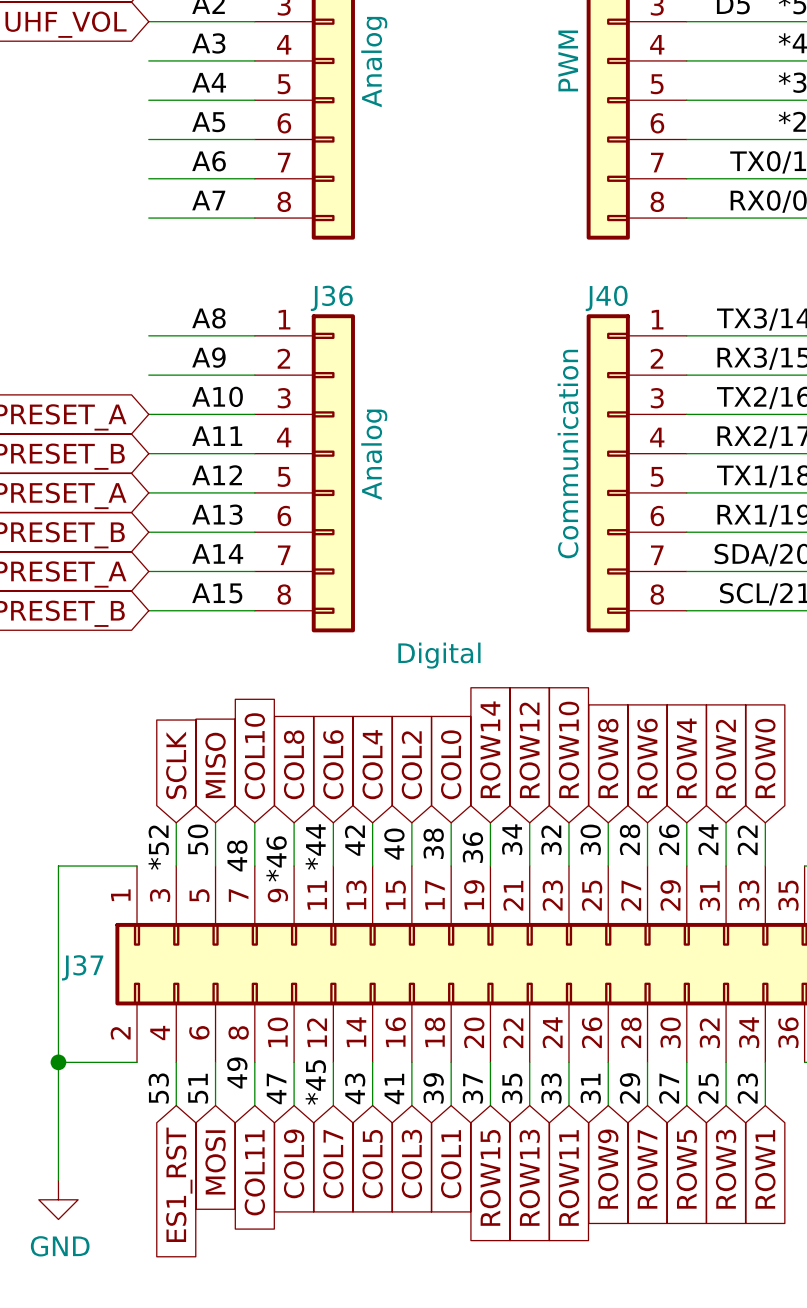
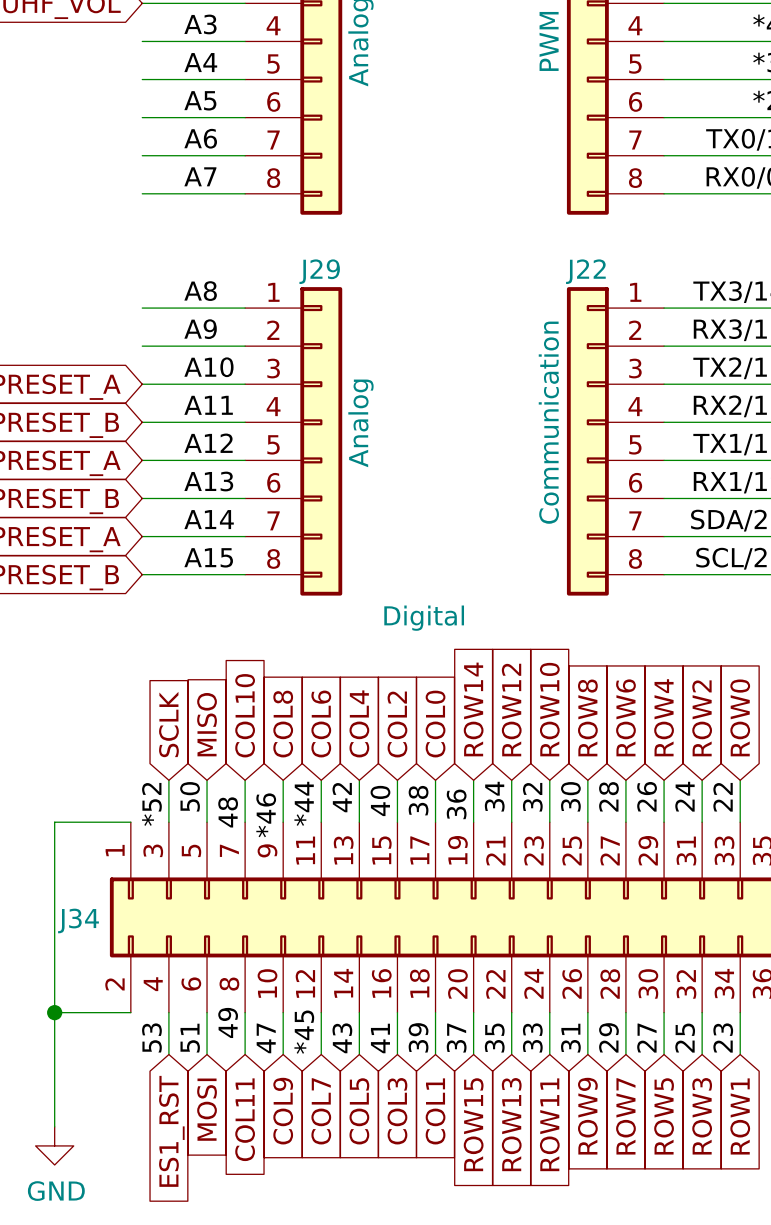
J36 name: J36 (331, 298) -> J29 (319, 271)
J40 name: J40 (606, 298) -> J22 (585, 271)
J37 name: J37 (82, 967) -> J34 (78, 920)

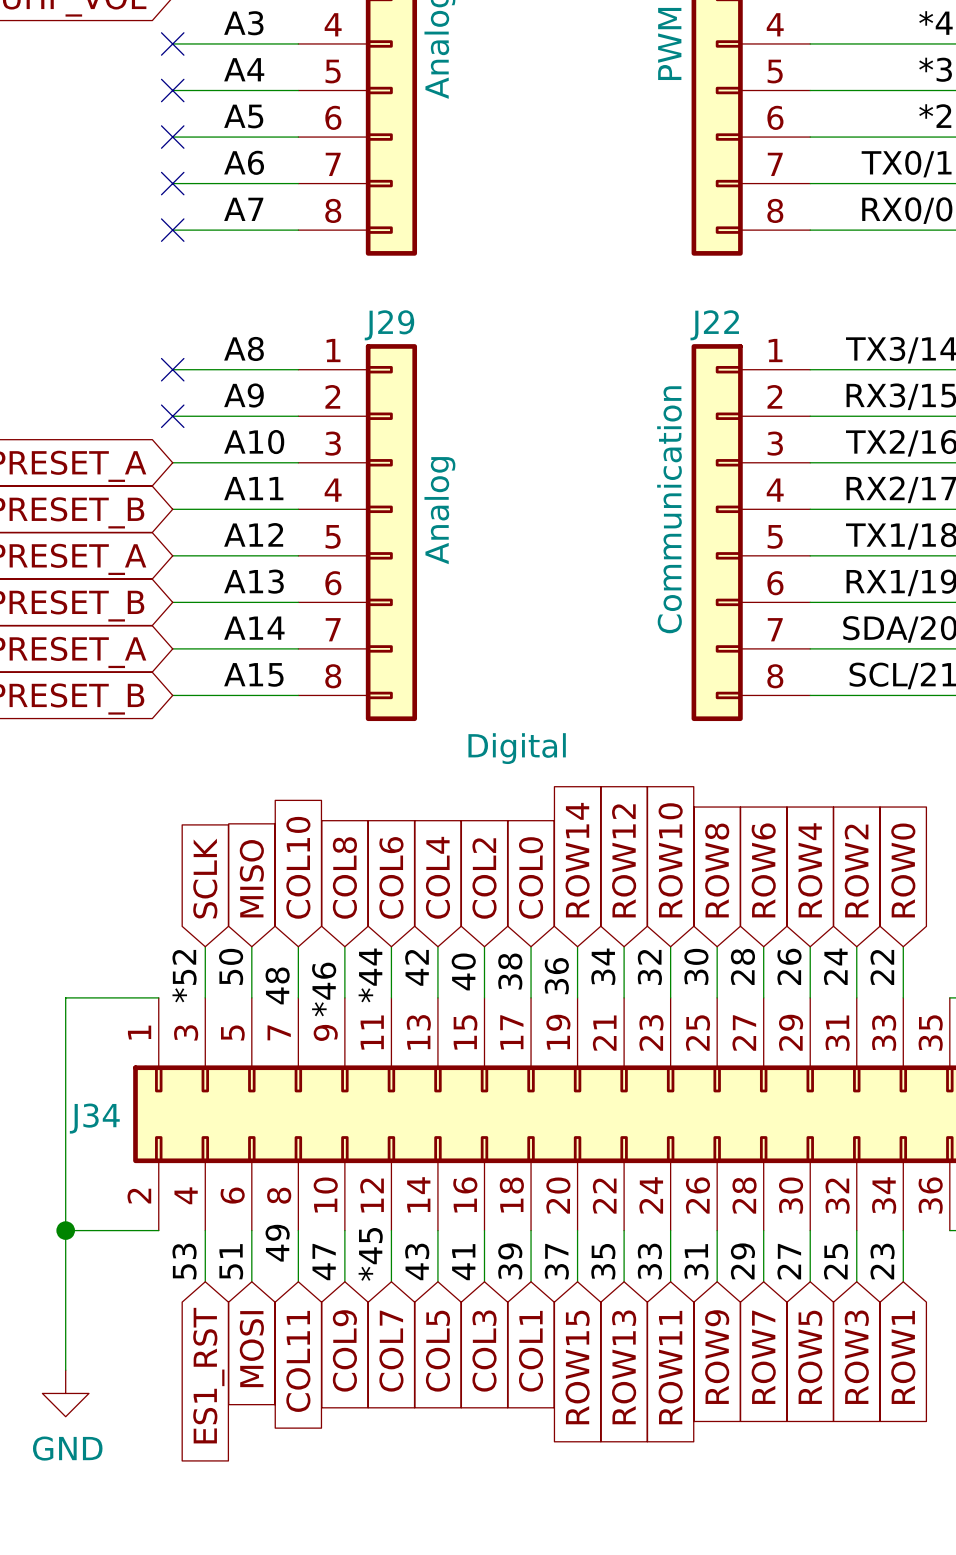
no-connect mark: none -> (172, 43)
no-connect mark: none -> (172, 90)
no-connect mark: none -> (172, 137)
no-connect mark: none -> (172, 183)
no-connect mark: none -> (172, 230)
no-connect mark: none -> (172, 369)
no-connect mark: none -> (172, 416)

